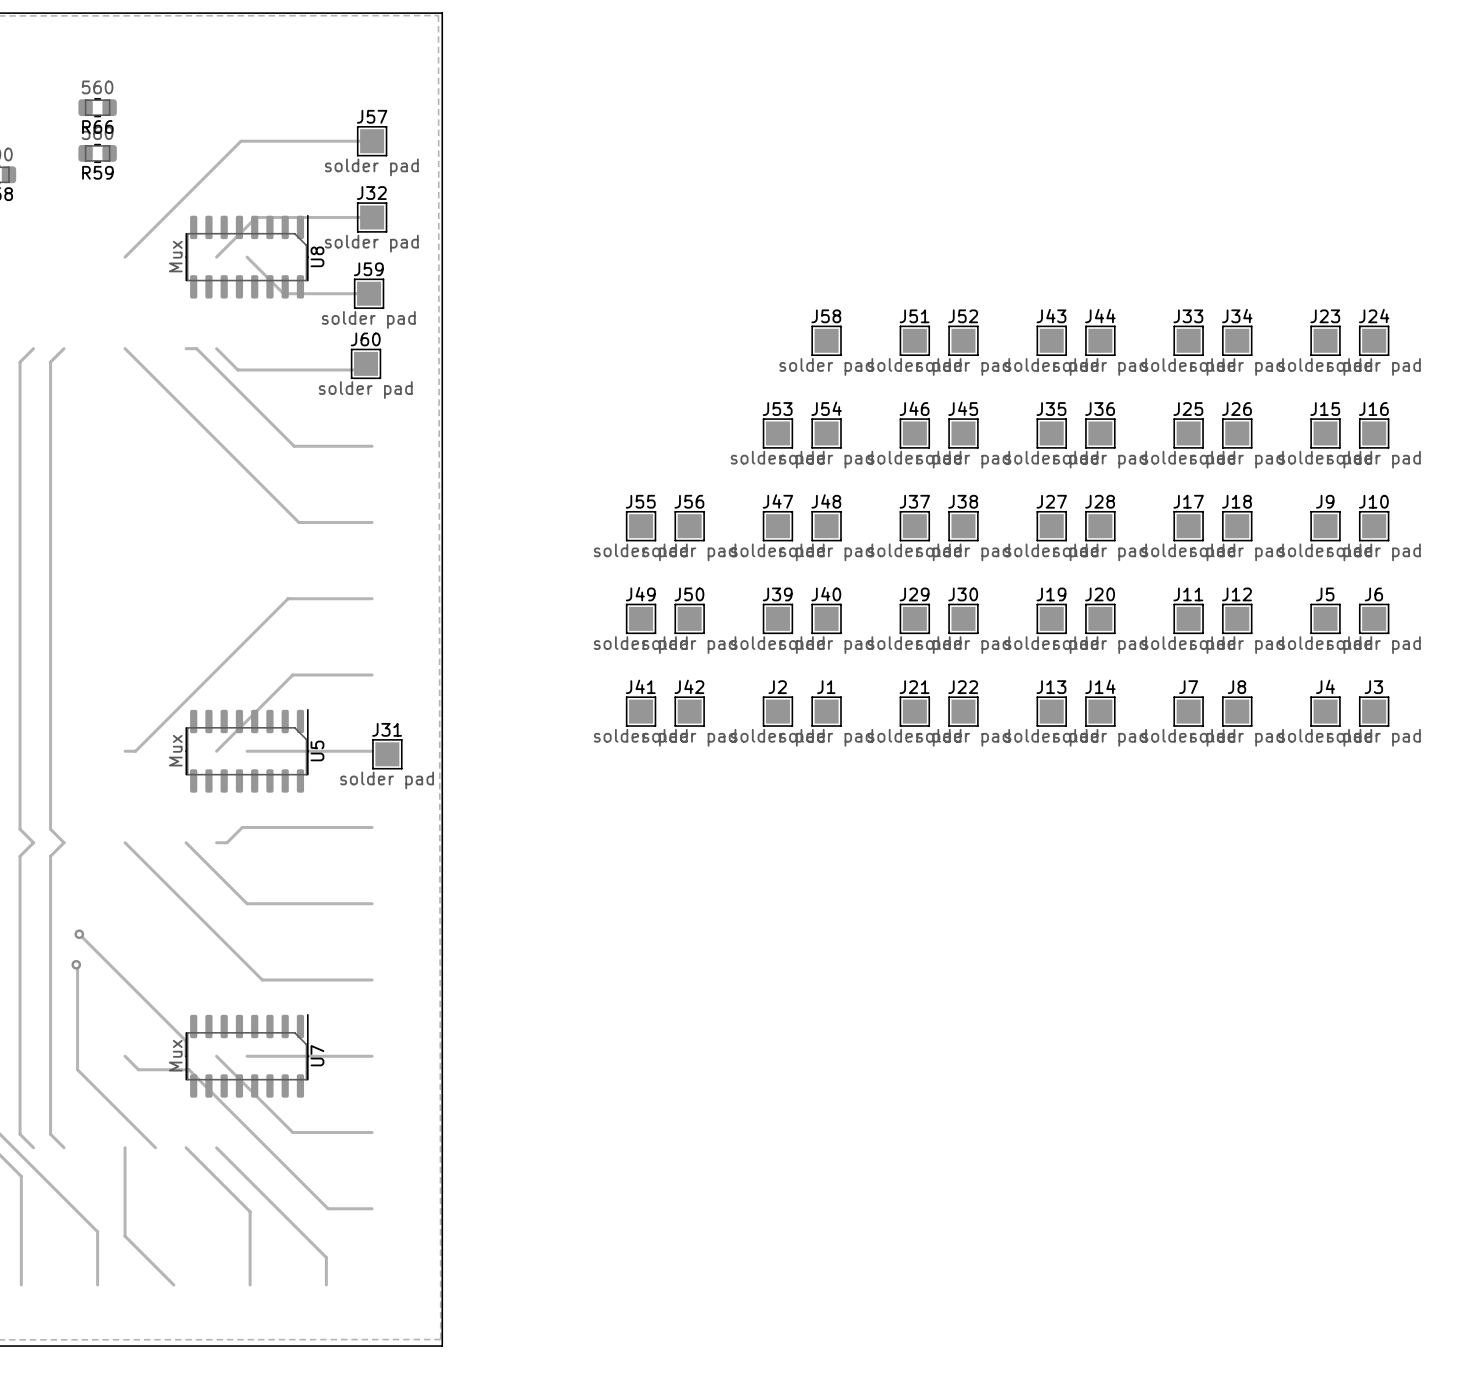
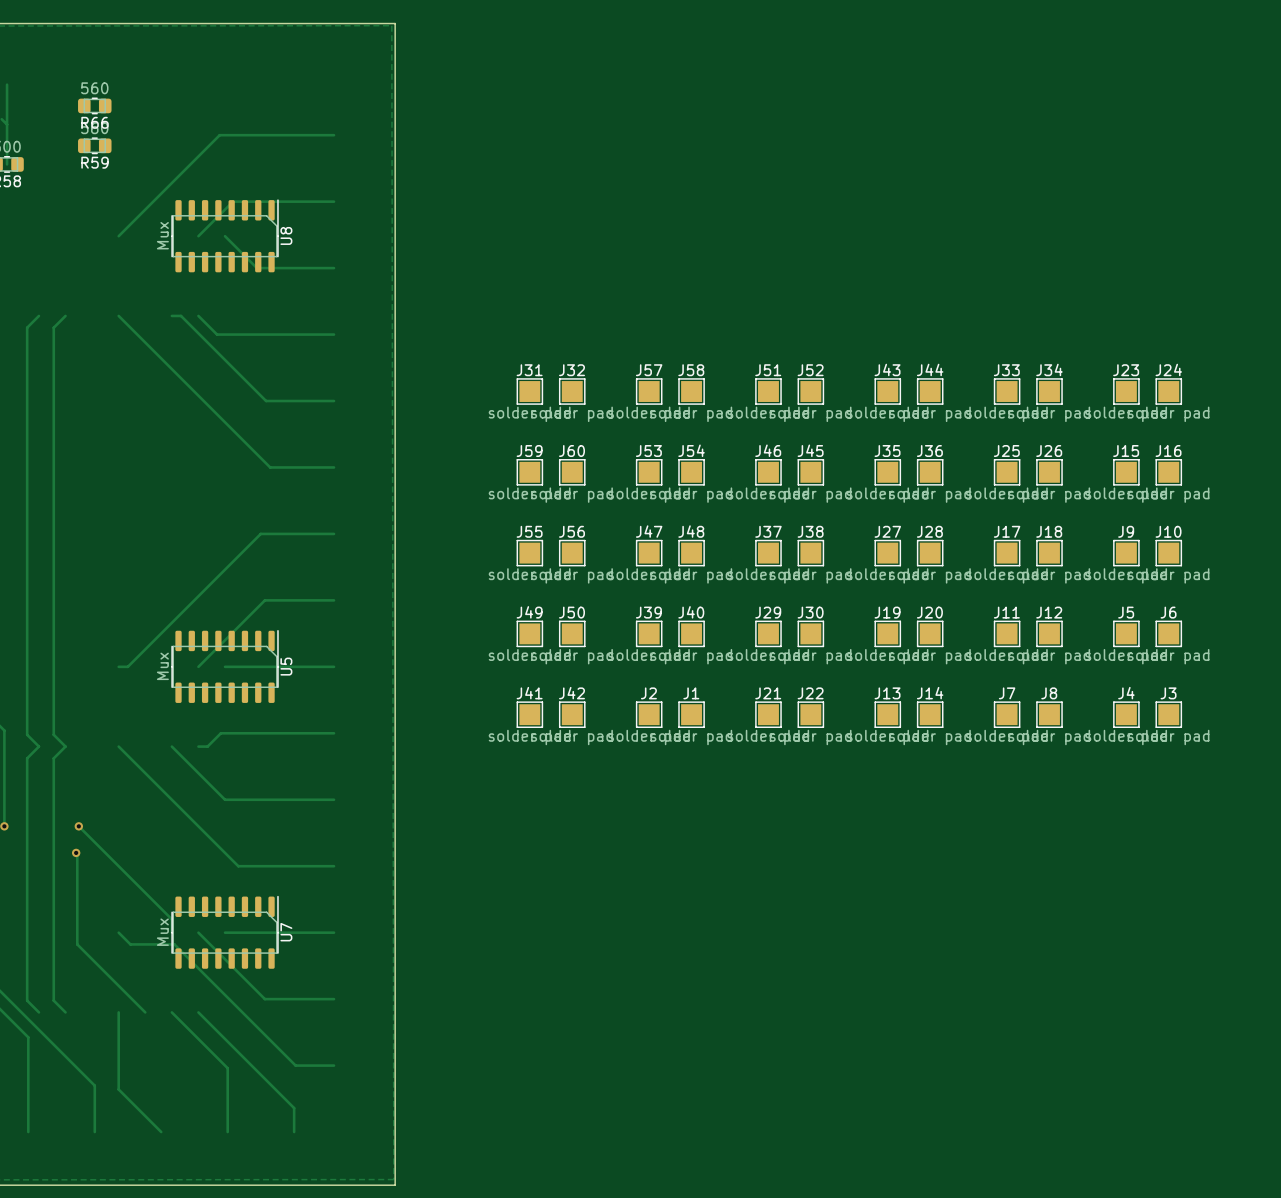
J57 position: (372, 141) -> (649, 391)
J32 position: (372, 217) -> (572, 391)
J59 position: (369, 293) -> (529, 472)
J58 position: (826, 340) -> (691, 391)
J51 position: (914, 340) -> (768, 391)
J52 position: (963, 340) -> (810, 391)
J43 position: (1051, 340) -> (887, 391)
J44 position: (1100, 340) -> (930, 391)
J33 position: (1188, 340) -> (1007, 391)
J34 position: (1237, 340) -> (1049, 391)
J23 position: (1325, 340) -> (1126, 391)
J24 position: (1374, 340) -> (1168, 391)
J60 position: (366, 363) -> (572, 472)
J53 position: (777, 433) -> (649, 472)
J54 position: (826, 433) -> (691, 472)
J46 position: (914, 433) -> (768, 472)
J45 position: (963, 433) -> (810, 472)
J35 position: (1051, 433) -> (887, 472)
J36 position: (1100, 433) -> (930, 472)
J25 position: (1188, 433) -> (1007, 472)
J26 position: (1237, 433) -> (1049, 472)
J15 position: (1325, 433) -> (1126, 472)
J16 position: (1374, 433) -> (1168, 472)
J55 position: (641, 526) -> (529, 553)
J56 position: (689, 526) -> (572, 553)
J47 position: (777, 526) -> (649, 553)
J48 position: (826, 526) -> (691, 553)
J37 position: (914, 526) -> (768, 553)
J38 position: (963, 526) -> (810, 553)
J27 position: (1051, 526) -> (887, 553)
J28 position: (1100, 526) -> (930, 553)
J17 position: (1188, 526) -> (1007, 553)
J18 position: (1237, 526) -> (1049, 553)
J9 position: (1325, 526) -> (1126, 553)
J10 position: (1374, 526) -> (1168, 553)
J49 position: (641, 618) -> (529, 633)
J50 position: (689, 618) -> (572, 633)
J39 position: (777, 618) -> (649, 633)
J40 position: (826, 618) -> (691, 633)
J29 position: (914, 618) -> (768, 633)
J30 position: (963, 618) -> (810, 633)
J19 position: (1051, 618) -> (887, 633)
J20 position: (1100, 618) -> (930, 633)
J11 position: (1188, 618) -> (1007, 633)
J12 position: (1237, 618) -> (1049, 633)
J5 position: (1325, 618) -> (1126, 633)
J6 position: (1374, 618) -> (1168, 633)
J41 position: (641, 711) -> (529, 714)
J42 position: (689, 711) -> (572, 714)
J2 position: (777, 711) -> (649, 714)
J1 position: (826, 711) -> (691, 714)
J21 position: (914, 711) -> (768, 714)
J22 position: (963, 711) -> (810, 714)
J13 position: (1051, 711) -> (887, 714)
J14 position: (1100, 711) -> (930, 714)
J7 position: (1188, 711) -> (1007, 714)
J8 position: (1237, 711) -> (1049, 714)
J4 position: (1325, 711) -> (1126, 714)
J3 position: (1374, 711) -> (1168, 714)
J31 position: (387, 754) -> (529, 391)

